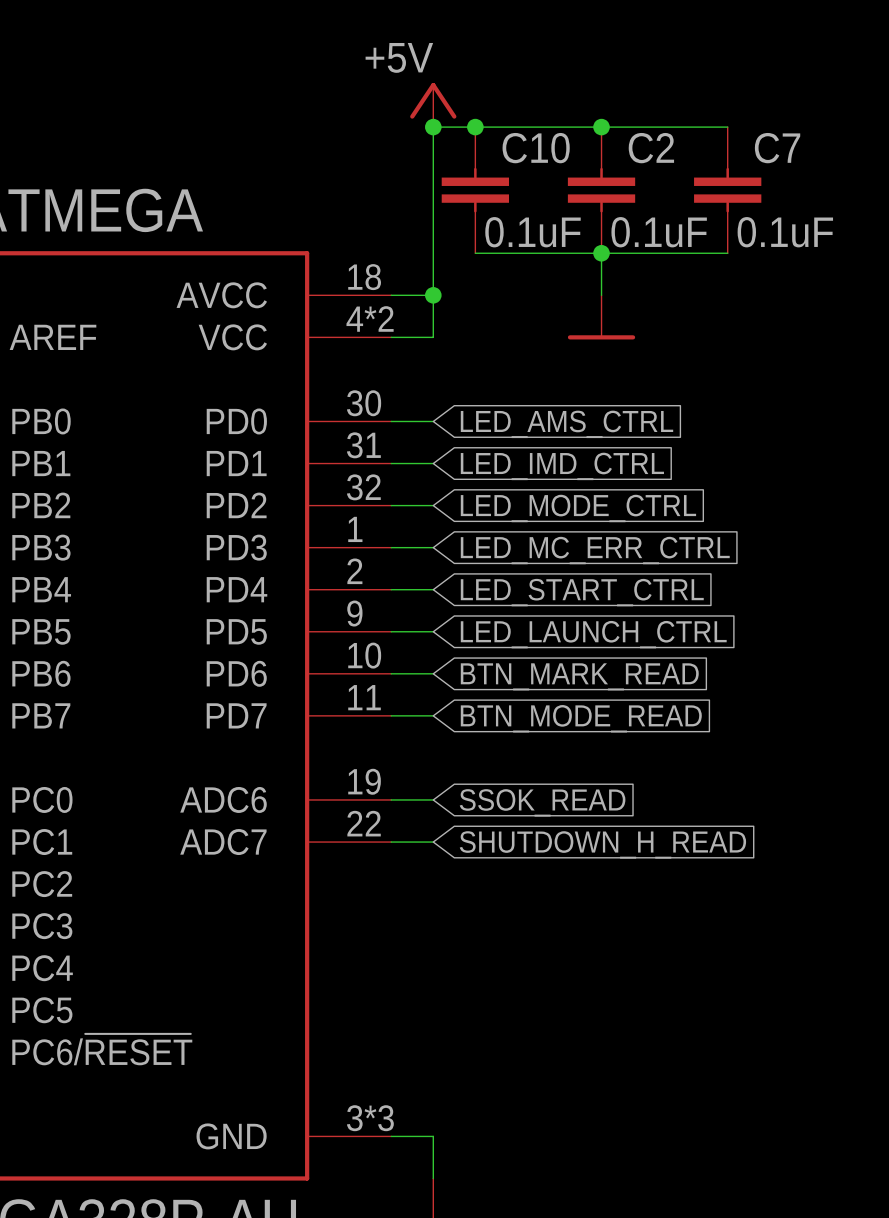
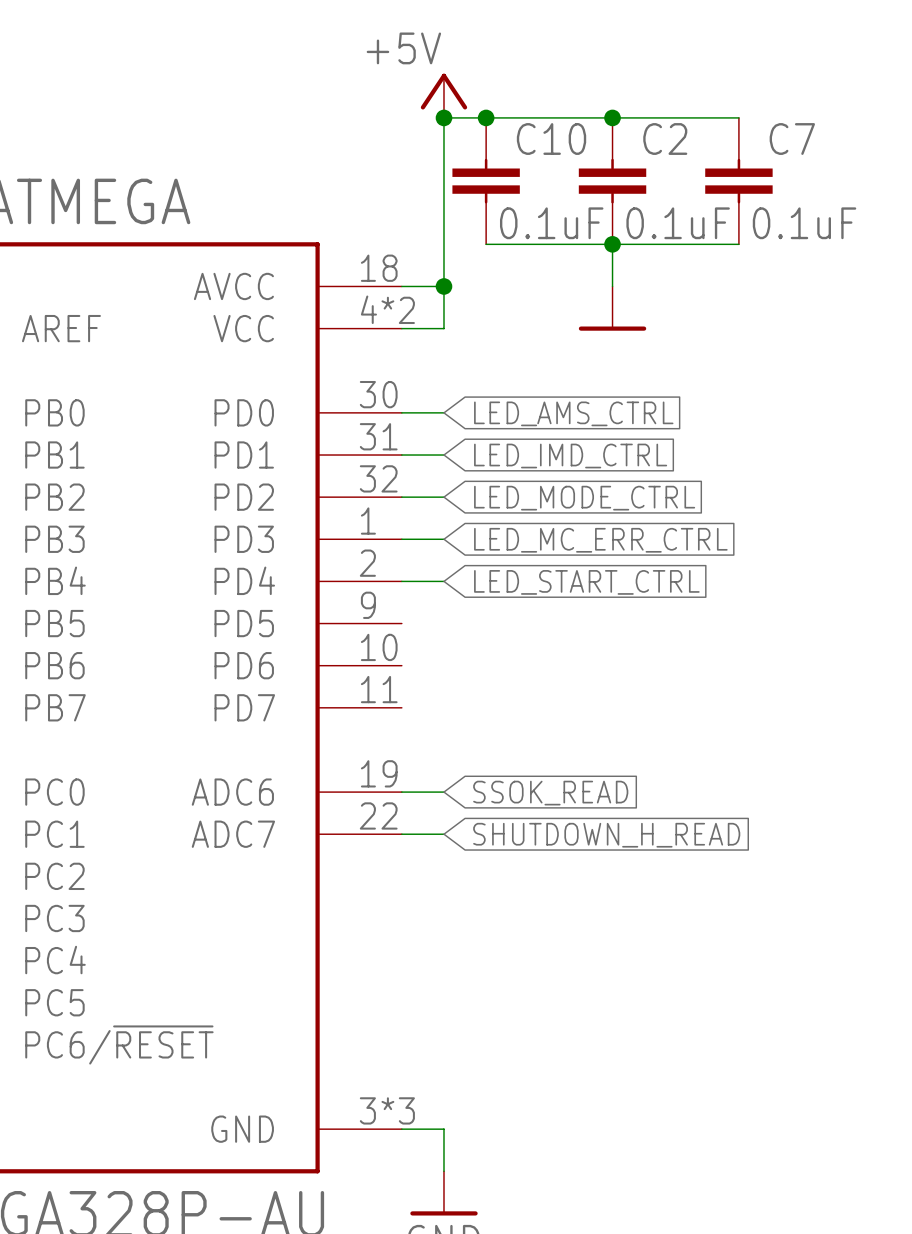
wire: (391, 631) (433, 631) -> none
global label: LED_LAUNCH_CTRL (593, 634) -> none
wire: (391, 673) (433, 673) -> none
global label: BTN_MARK_READ (579, 676) -> none
wire: (391, 715) (433, 715) -> none
global label: BTN_MODE_READ (581, 718) -> none

